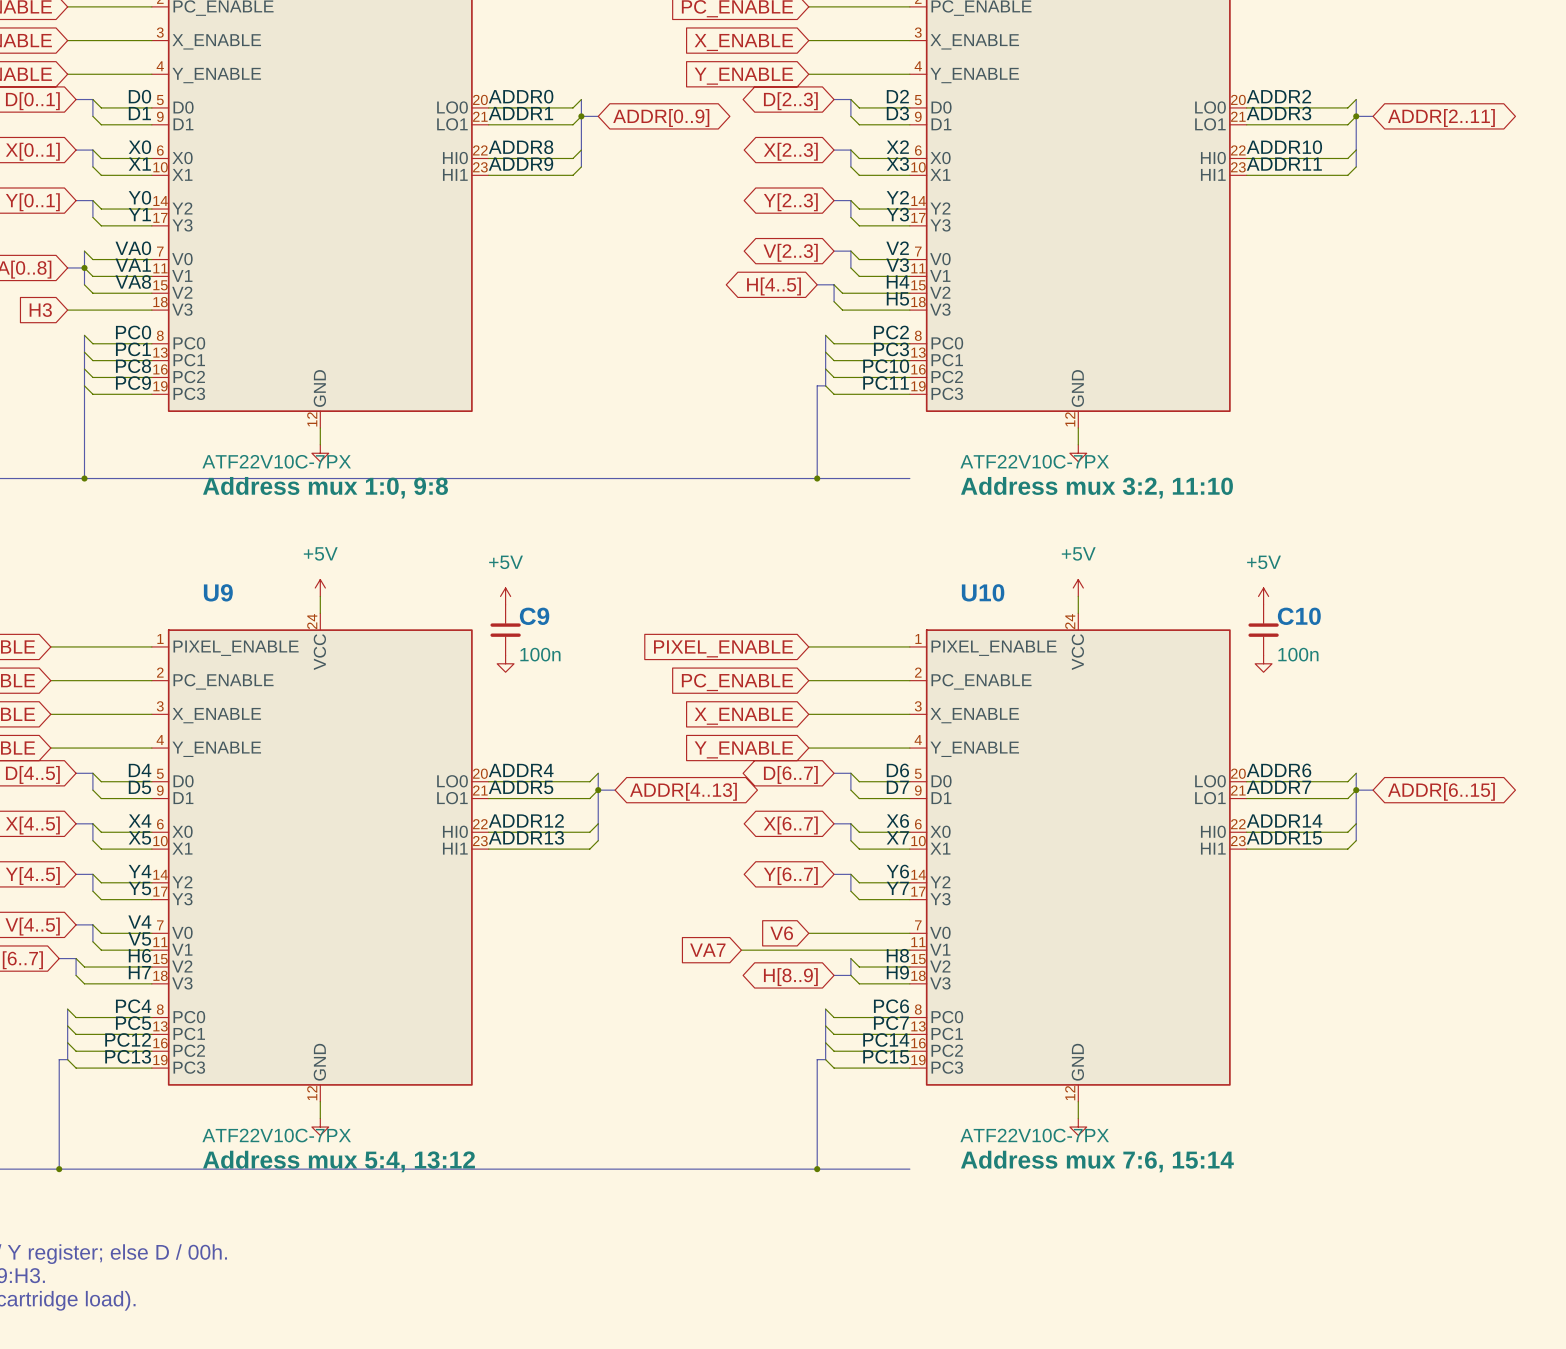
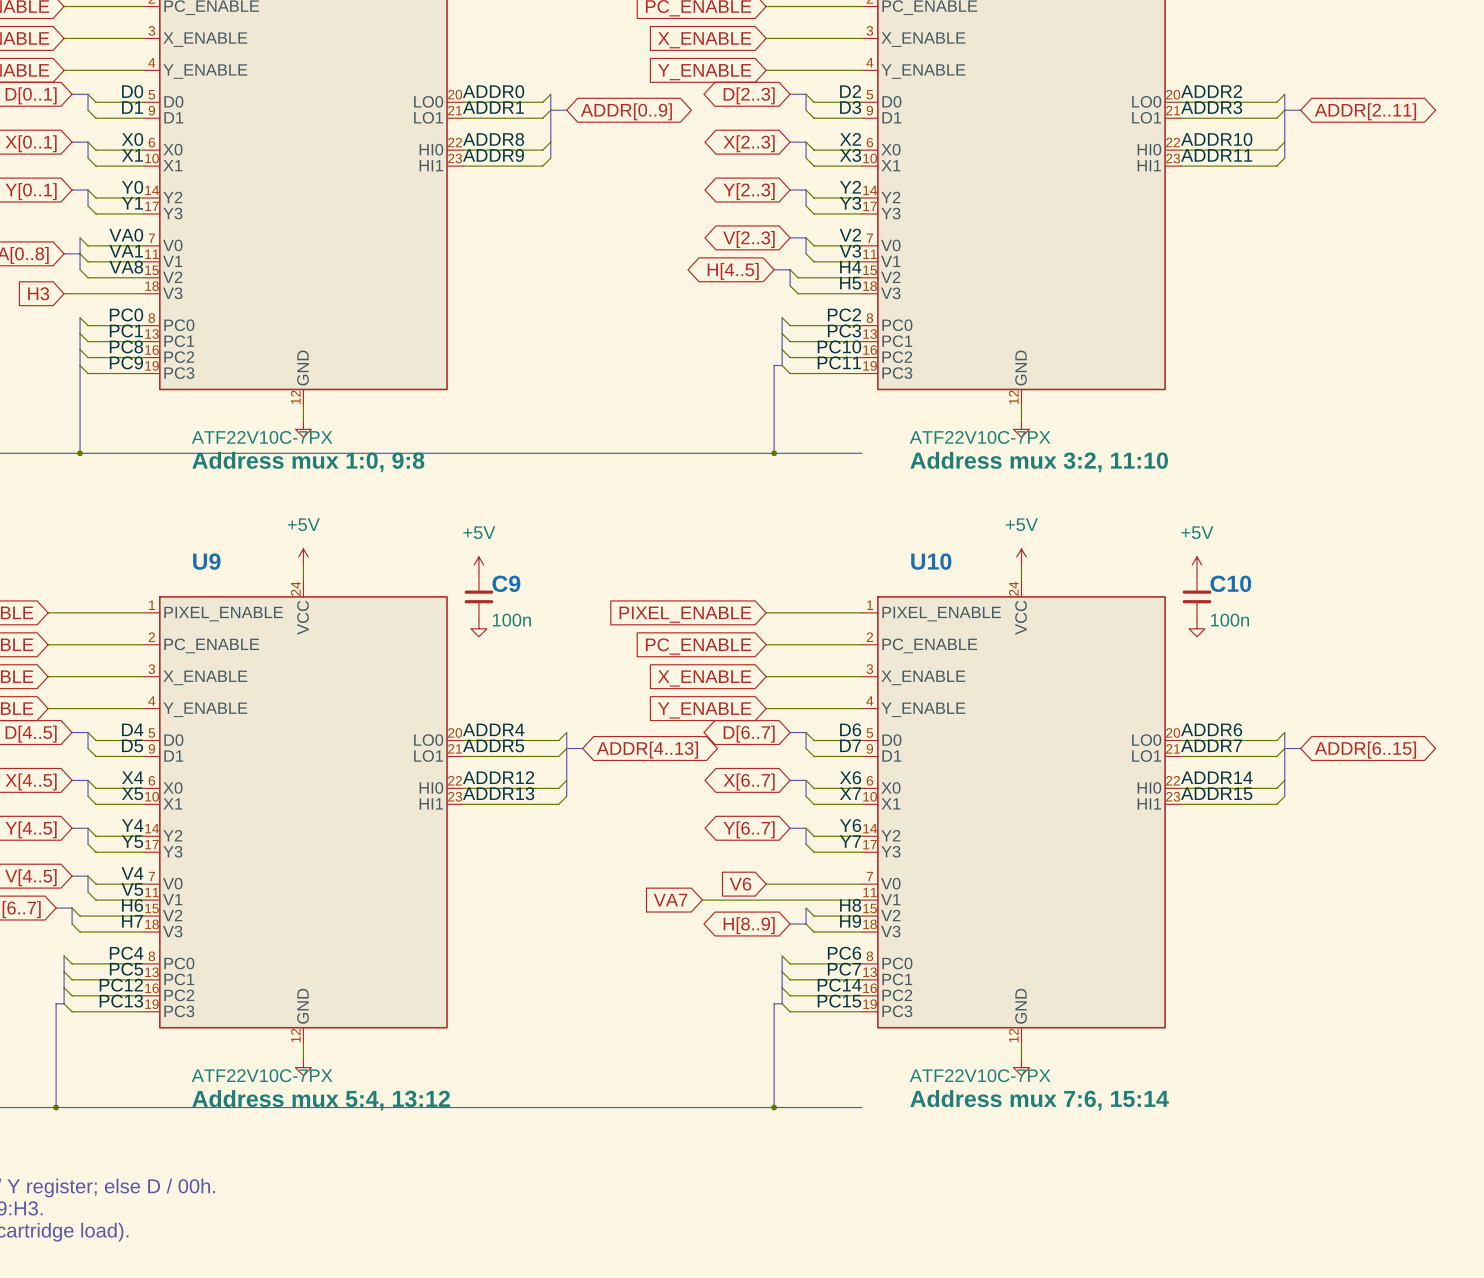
junction: (581, 116) -> none
junction: (1356, 116) -> none
junction: (84, 267) -> none
junction: (598, 790) -> none
junction: (1356, 790) -> none

